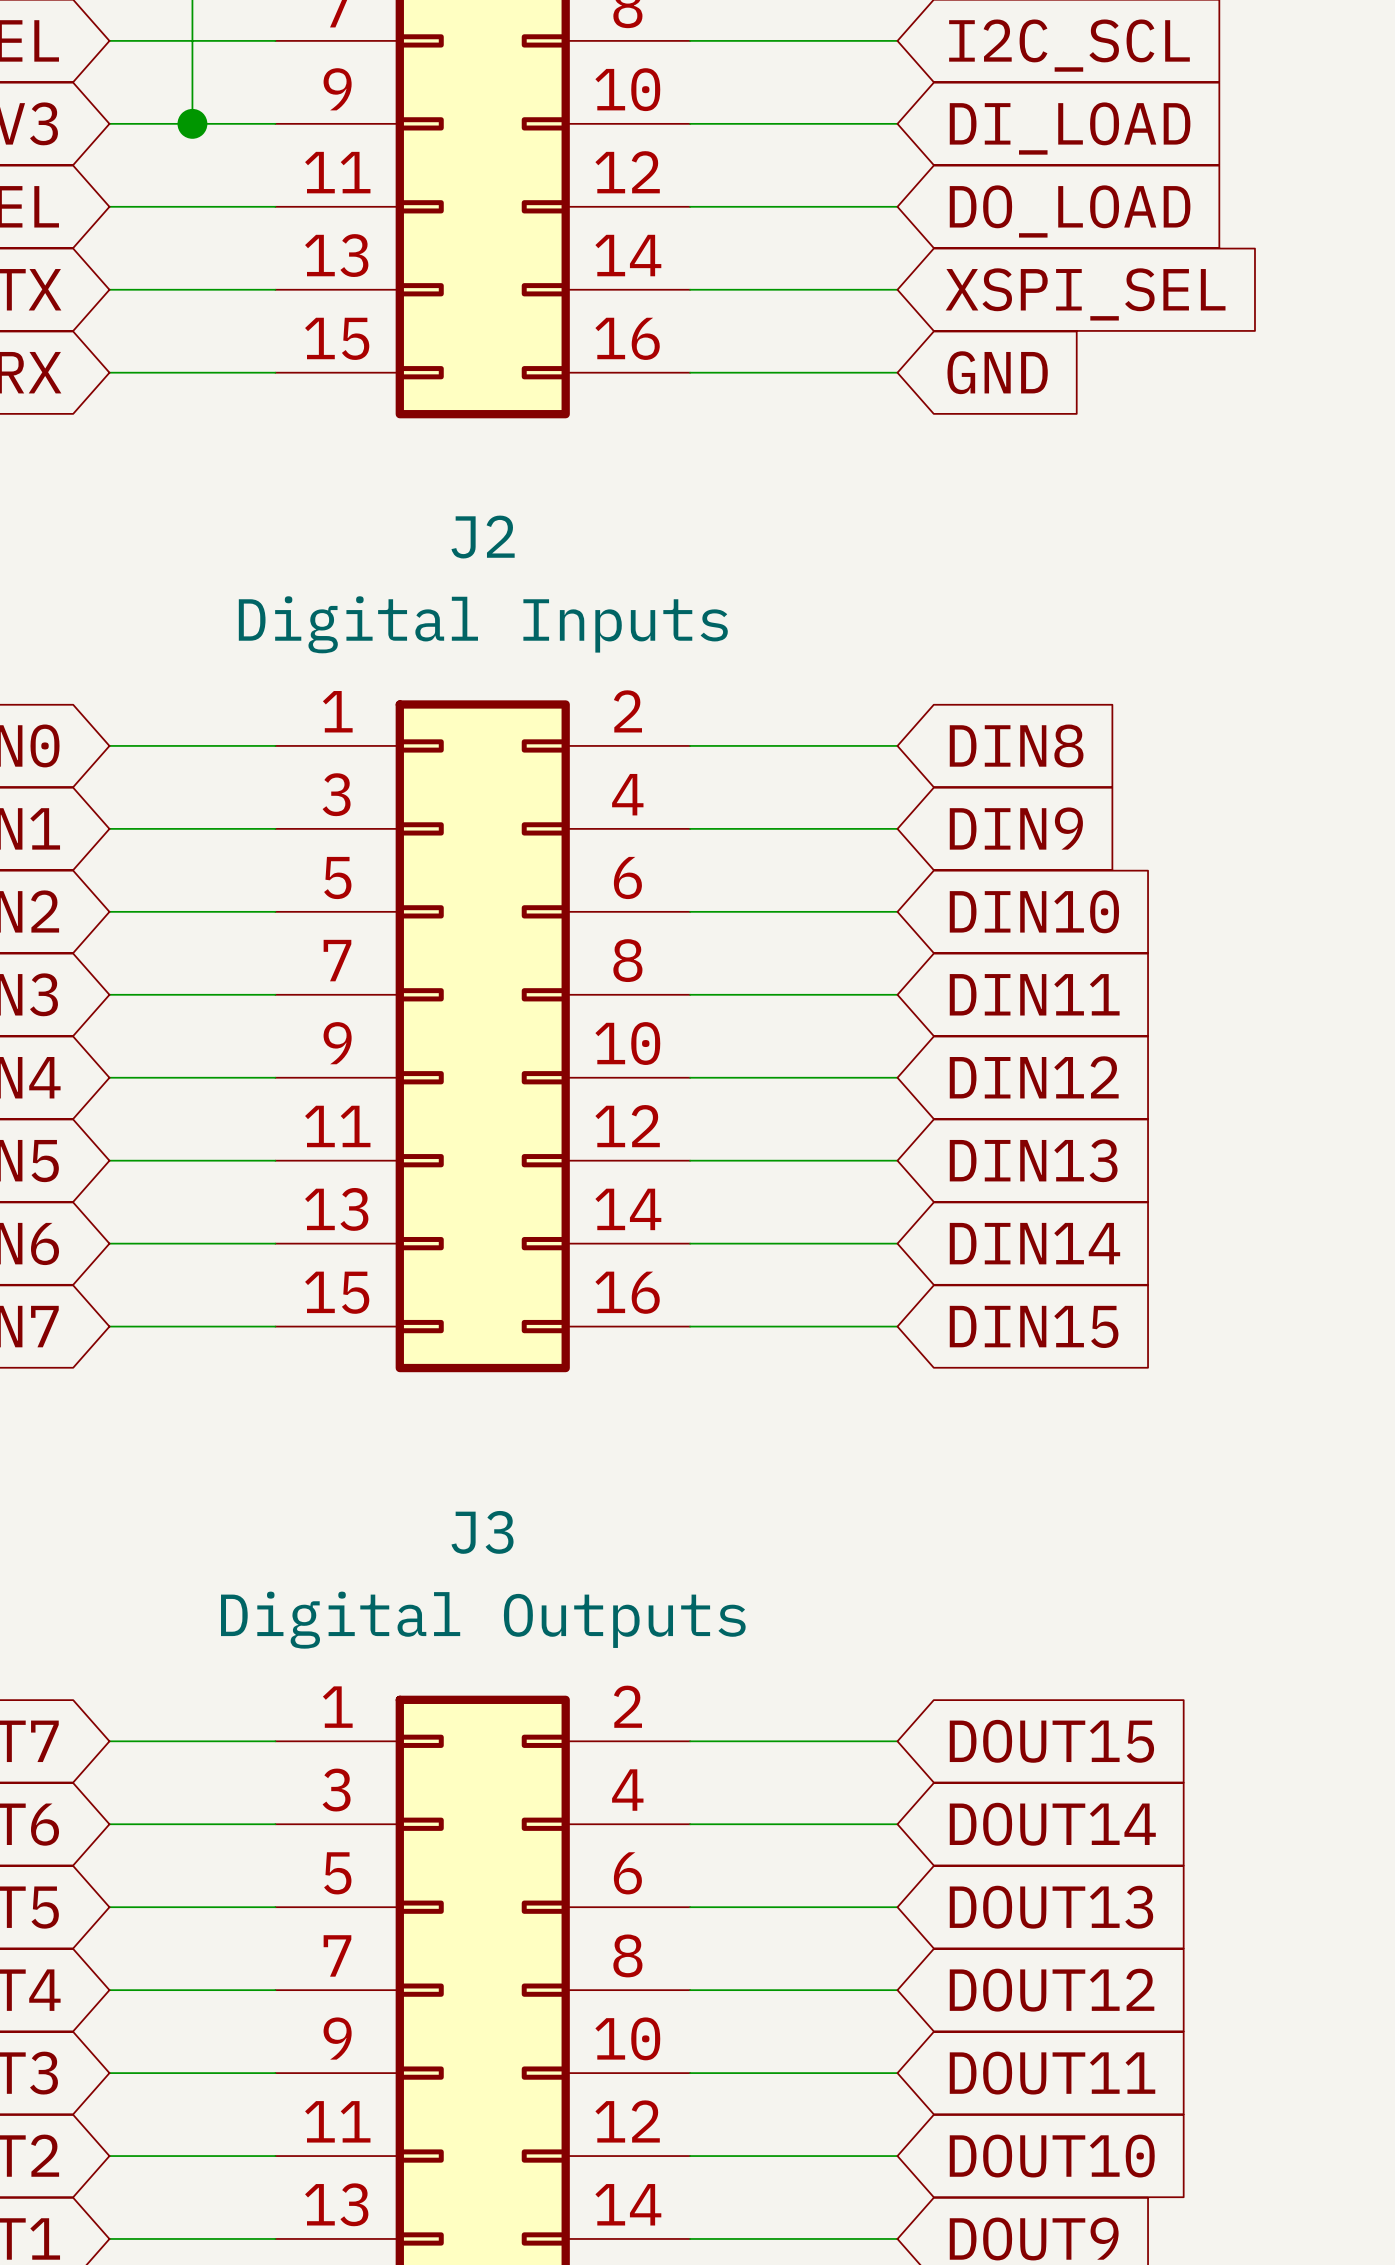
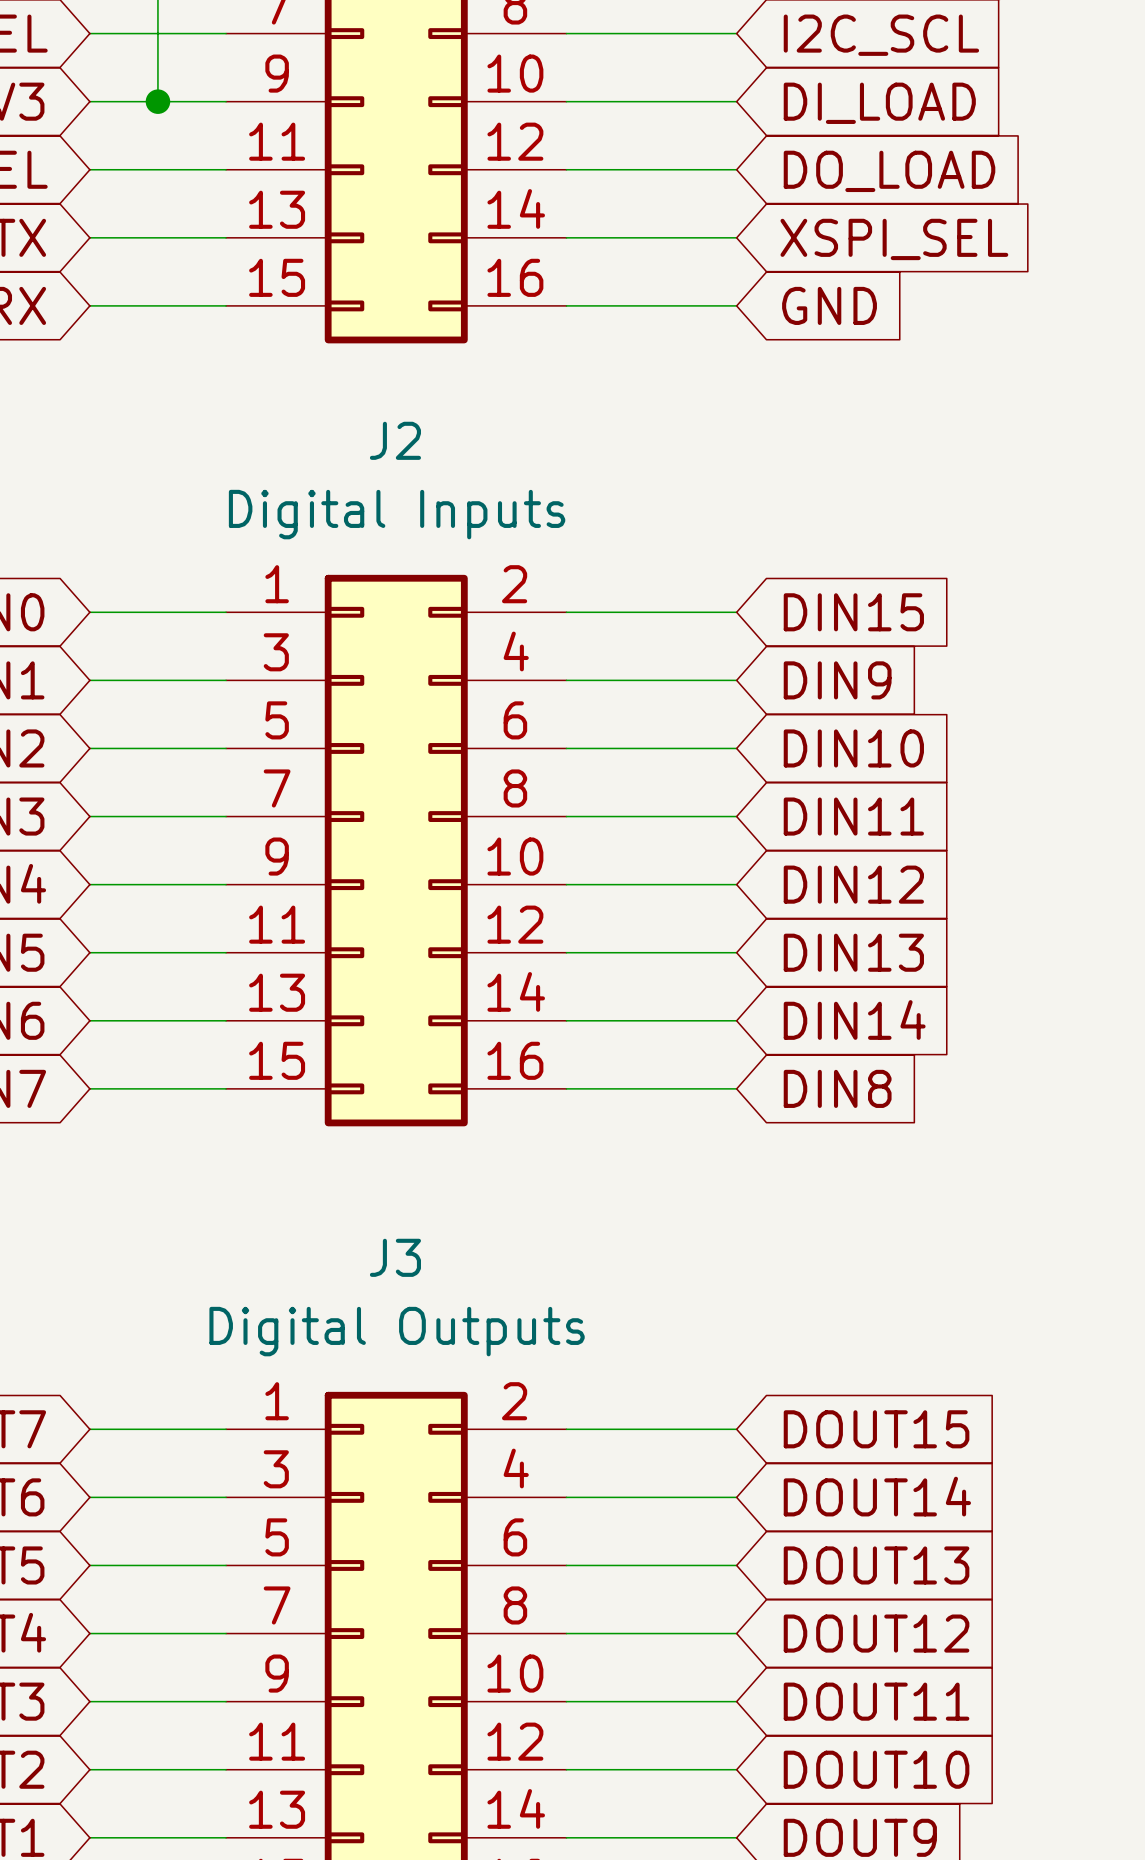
global label: DIN8 (1016, 745) -> DIN15 (853, 612)
global label: DIN15 (1034, 1326) -> DIN8 (837, 1088)

